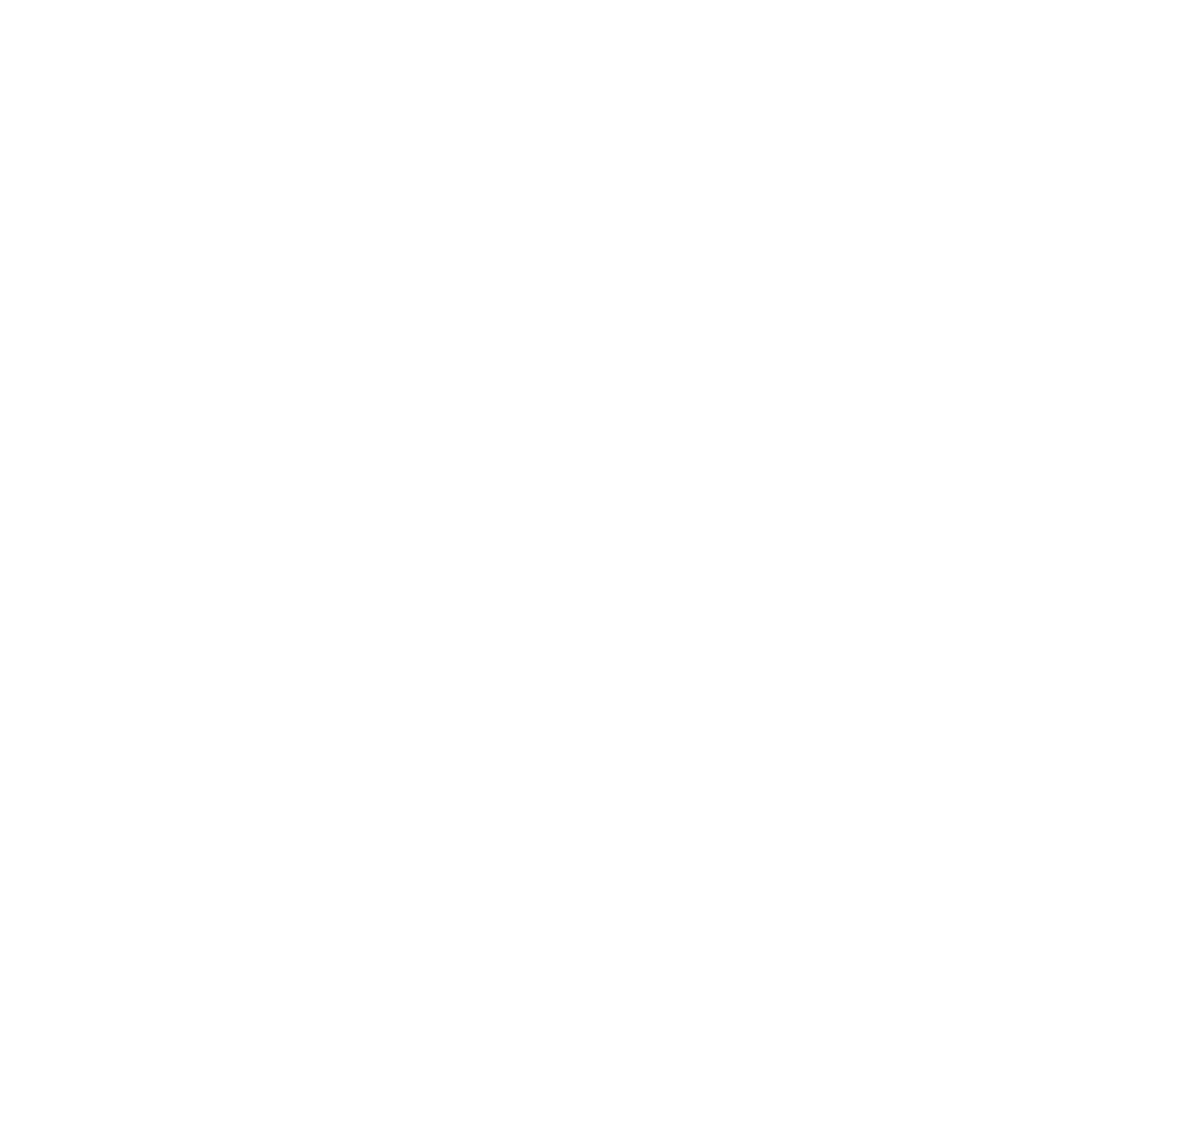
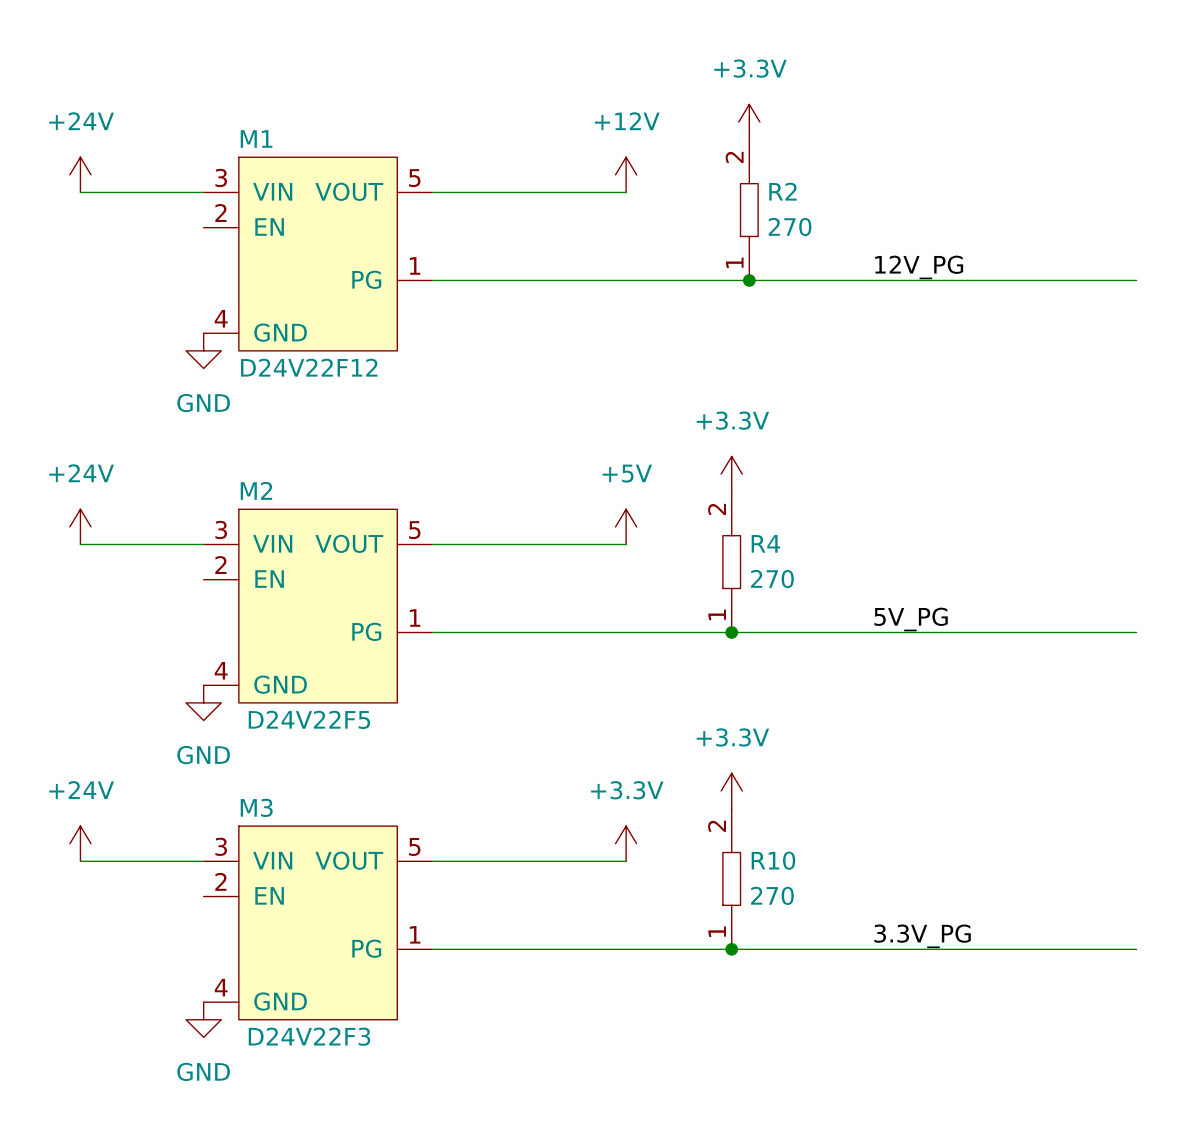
power symbol: none -> +3.3V (749, 122)
power symbol: none -> +24V (80, 174)
power symbol: none -> +12V (626, 174)
wire: none -> (80, 192) (203, 192)
wire: none -> (432, 192) (626, 192)
R2: none -> (749, 210)
M1: none -> (318, 254)
label: none -> 12V_PG (919, 267)
wire: none -> (432, 280) (1136, 280)
junction: none -> (749, 280)
power symbol: none -> GND (203, 350)
power symbol: none -> +3.3V (731, 474)
power symbol: none -> +24V (80, 526)
power symbol: none -> +5V (626, 526)
wire: none -> (80, 544) (203, 544)
wire: none -> (432, 544) (626, 544)
R4: none -> (731, 562)
M2: none -> (318, 606)
label: none -> 5V_PG (911, 619)
wire: none -> (432, 632) (1136, 632)
junction: none -> (731, 632)
power symbol: none -> GND (203, 702)
power symbol: none -> +3.3V (731, 790)
power symbol: none -> +24V (80, 843)
power symbol: none -> +3.3V (626, 843)
wire: none -> (80, 861) (203, 861)
wire: none -> (432, 861) (626, 861)
R10: none -> (731, 878)
M3: none -> (318, 922)
label: none -> 3.3V_PG (922, 936)
wire: none -> (432, 949) (1136, 949)
junction: none -> (731, 949)
power symbol: none -> GND (203, 1019)

